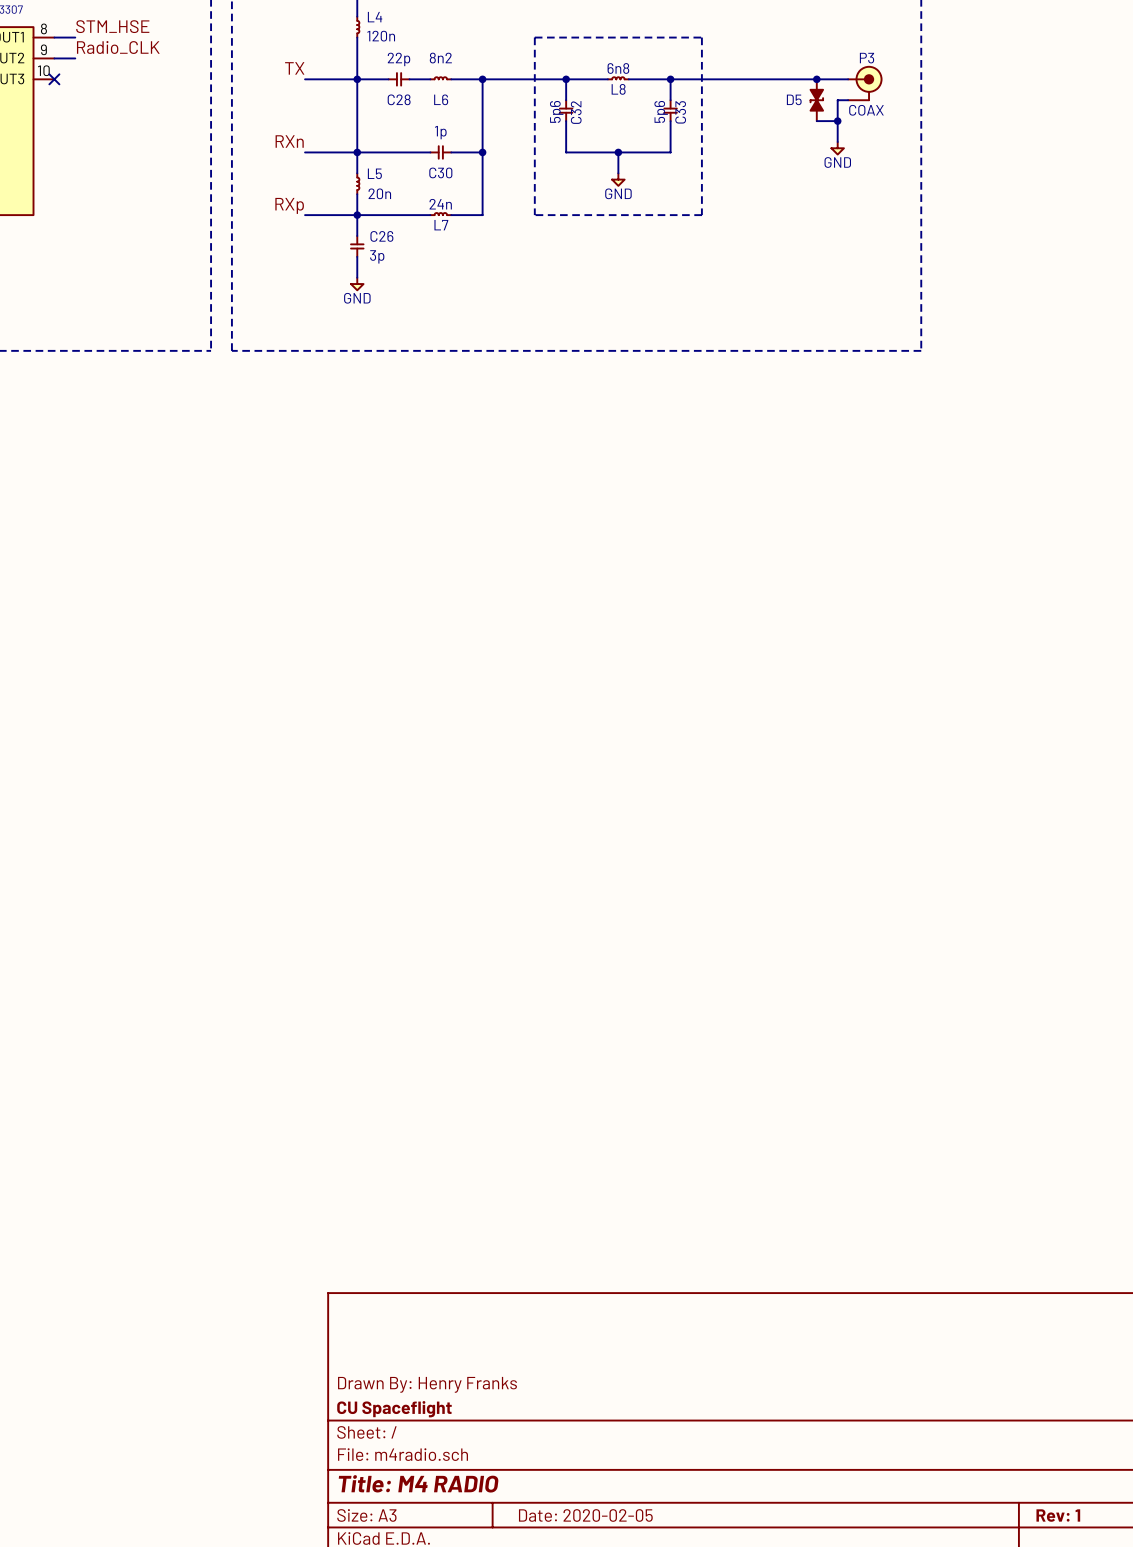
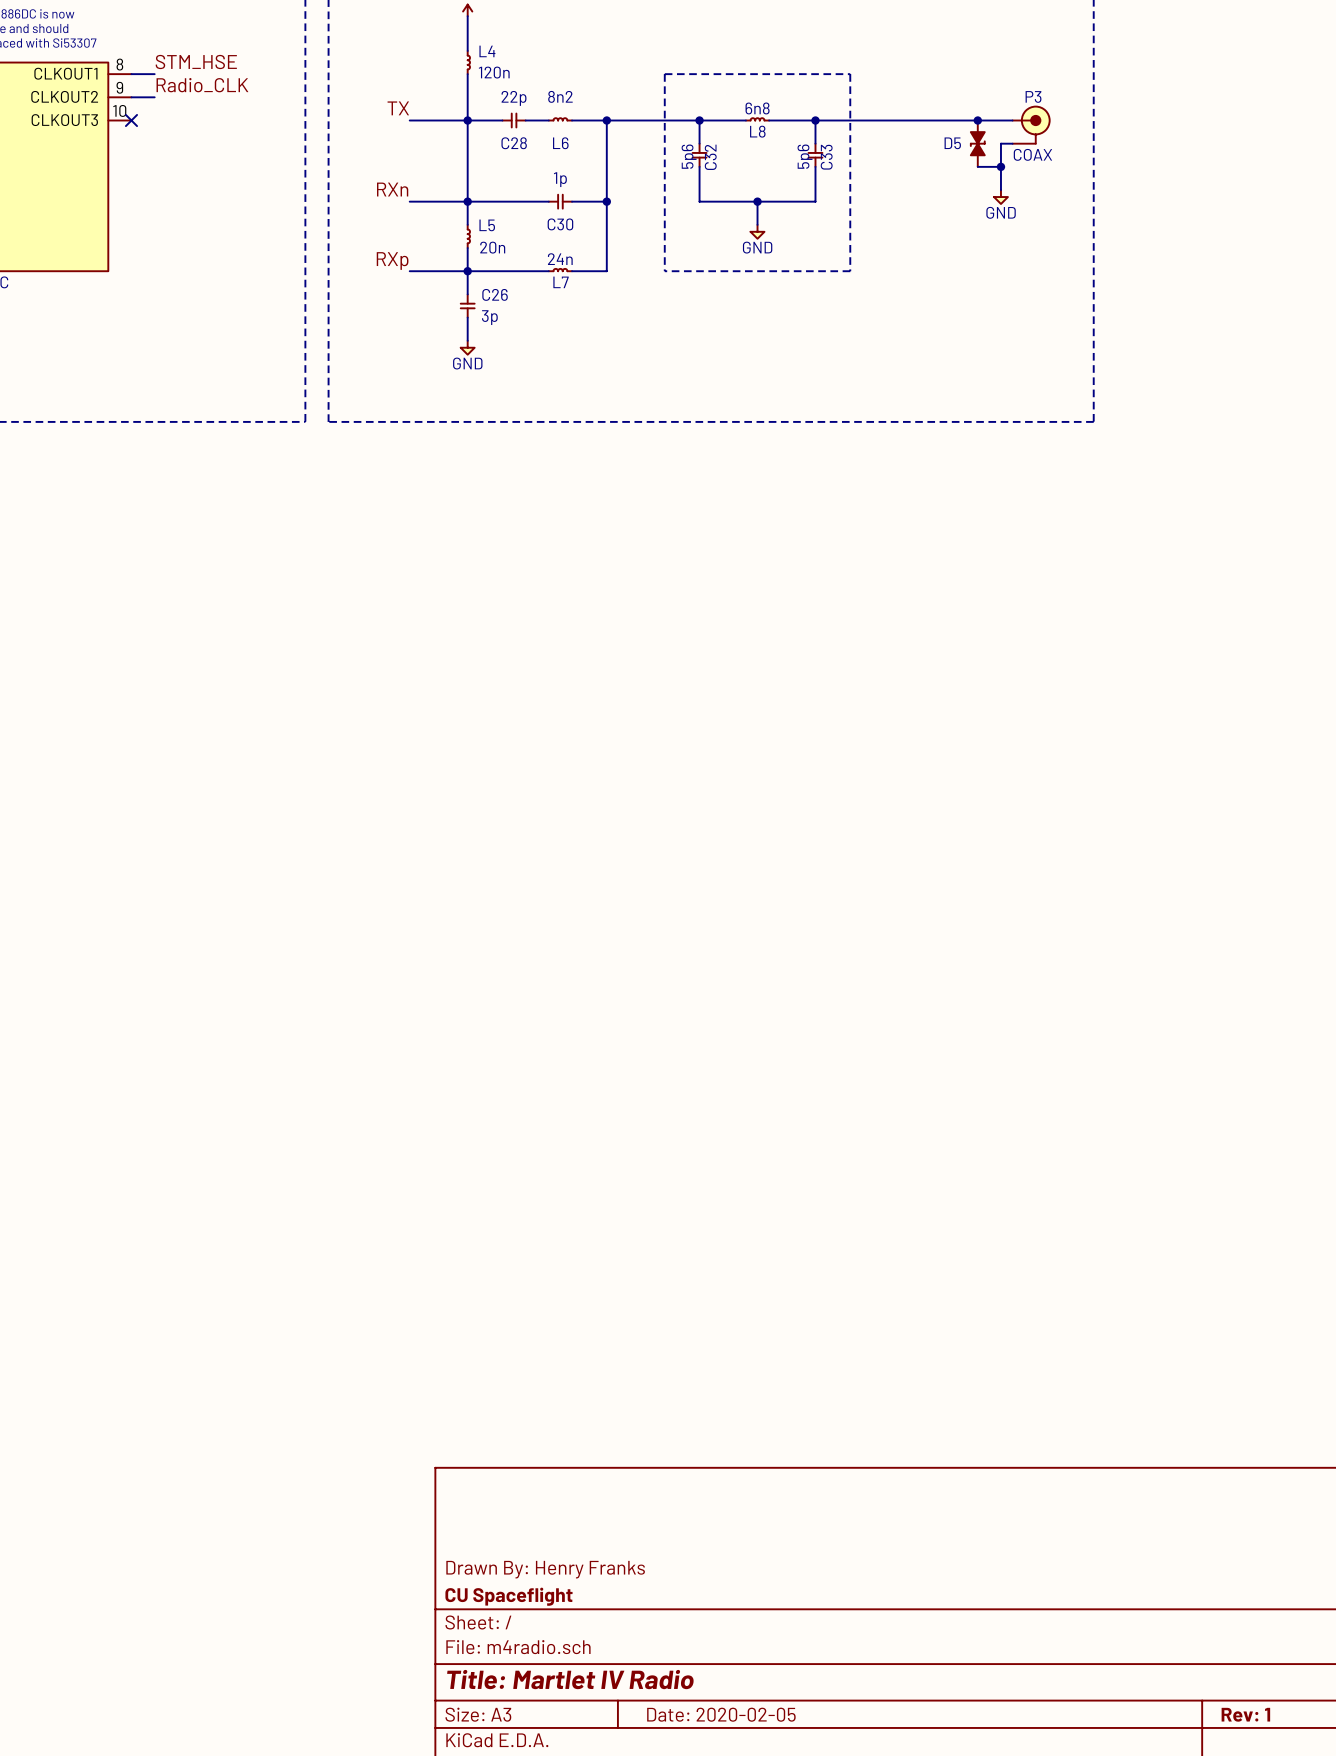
title block: Title: M4 RADIO (418, 1483) -> Title: Martlet IV Radio (570, 1679)

